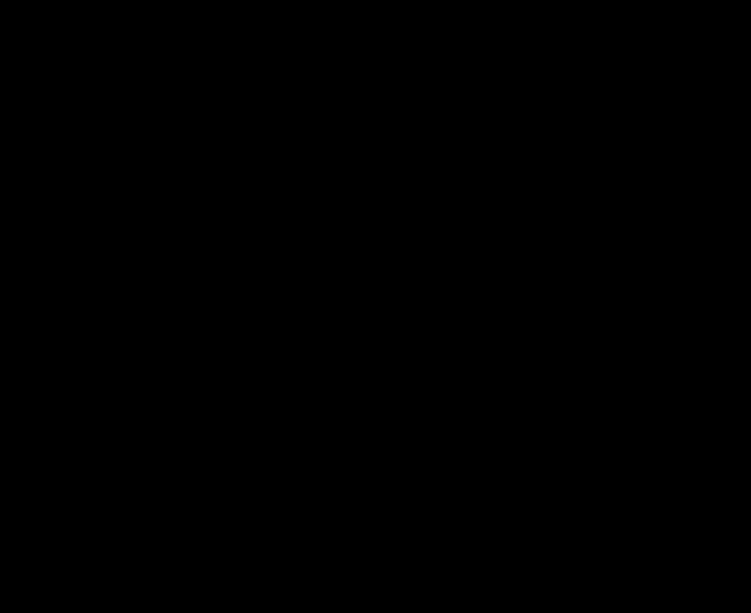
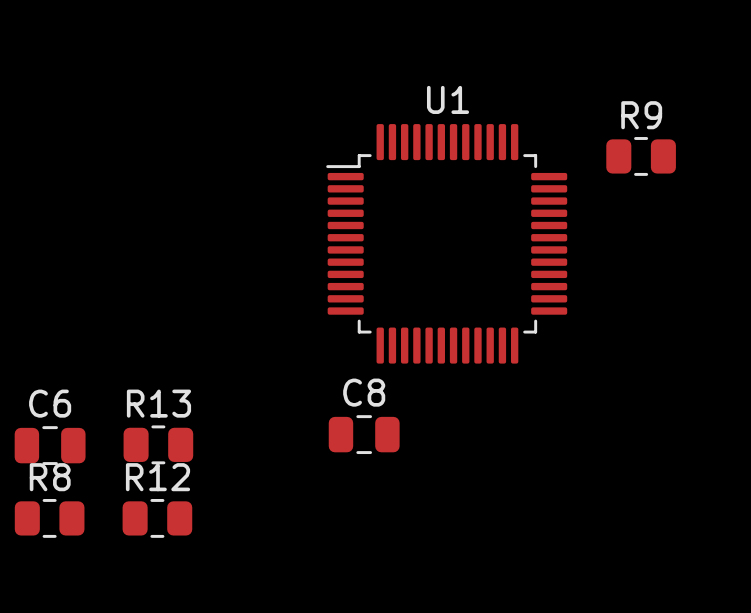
R9: none -> (641, 156)
U1: none -> (446, 243)
C8: none -> (364, 434)
R13: none -> (158, 444)
C6: none -> (50, 445)
R8: none -> (49, 518)
R12: none -> (157, 518)

